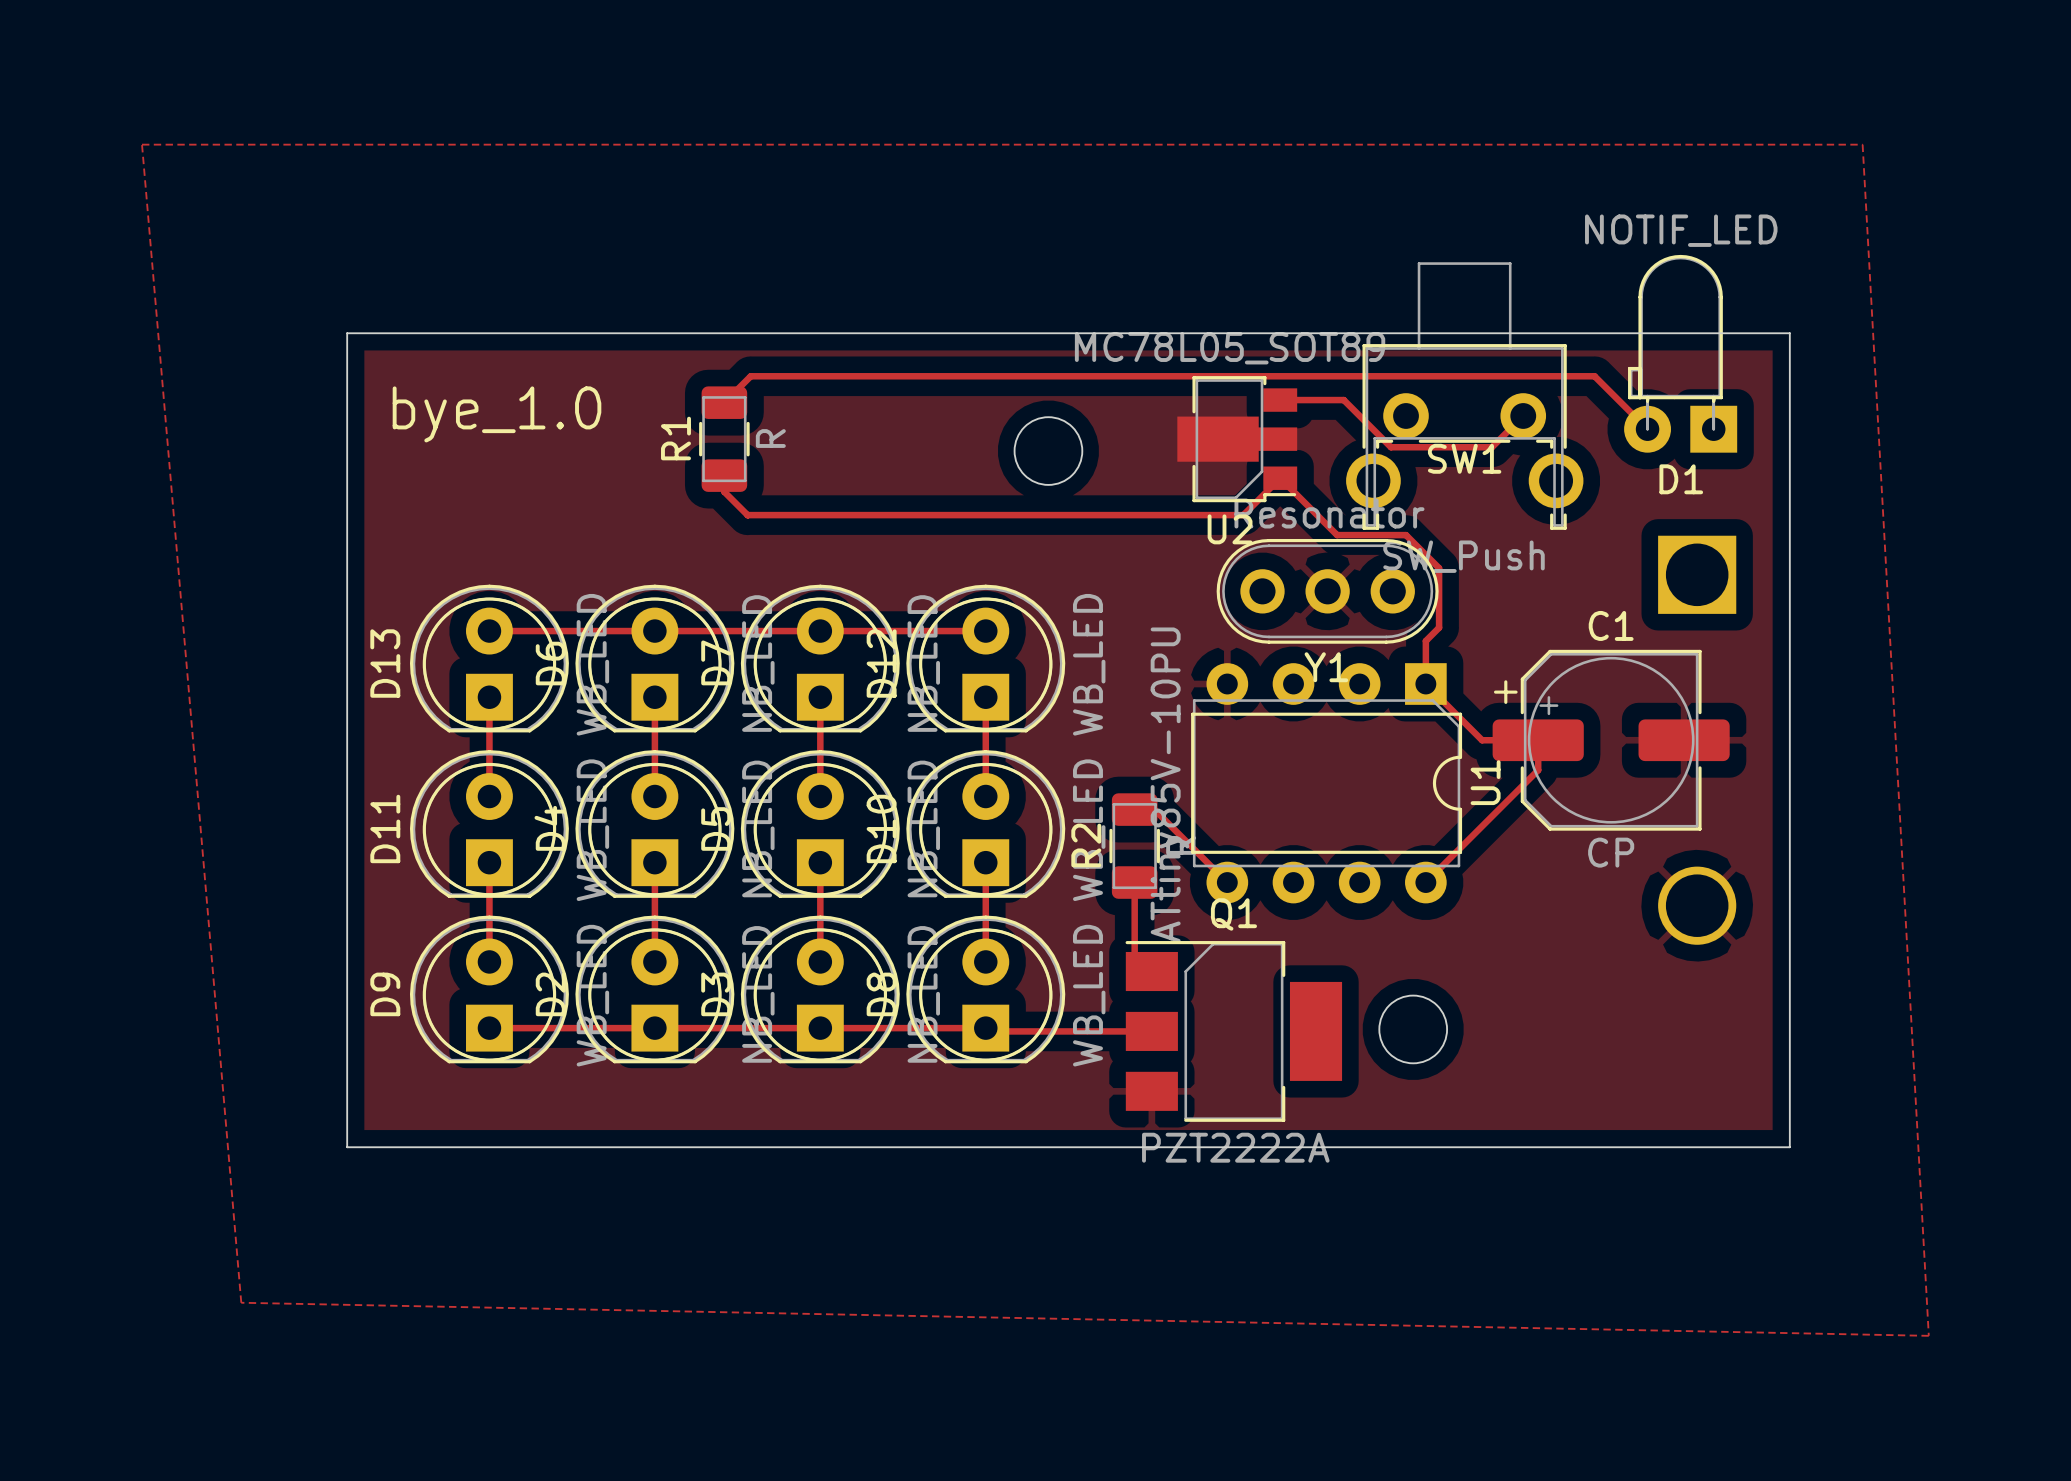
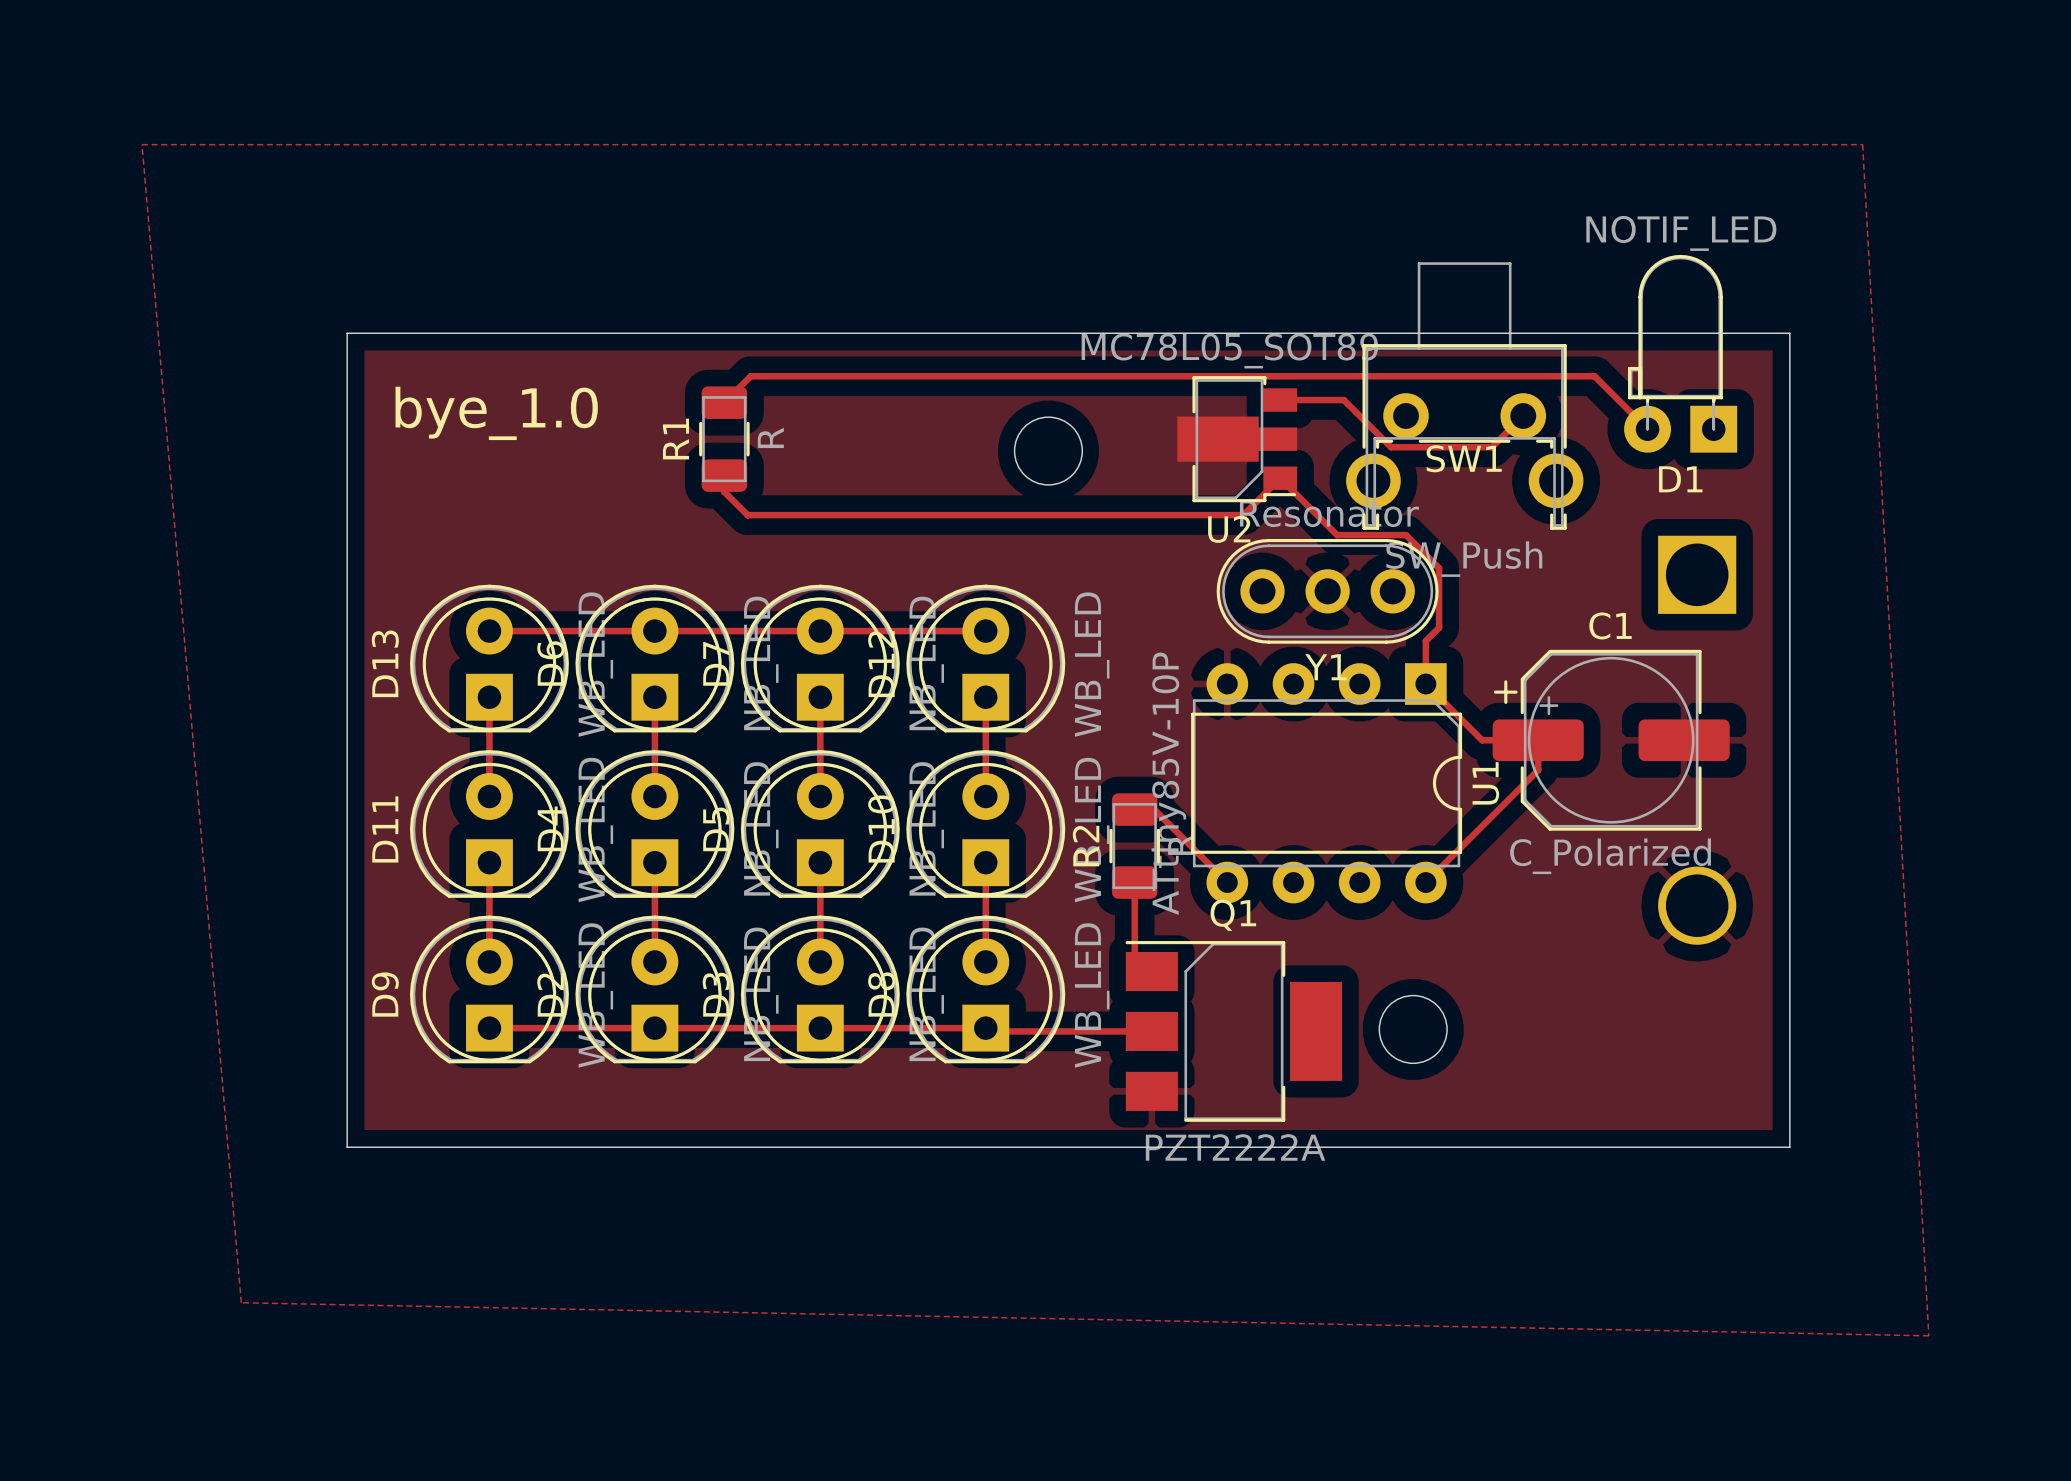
U1 value: ATtiny85V-10PU (1169, 785) -> ATtiny85V-10P (1168, 783)
C1 value: CP (1611, 852) -> C_Polarized (1610, 856)

